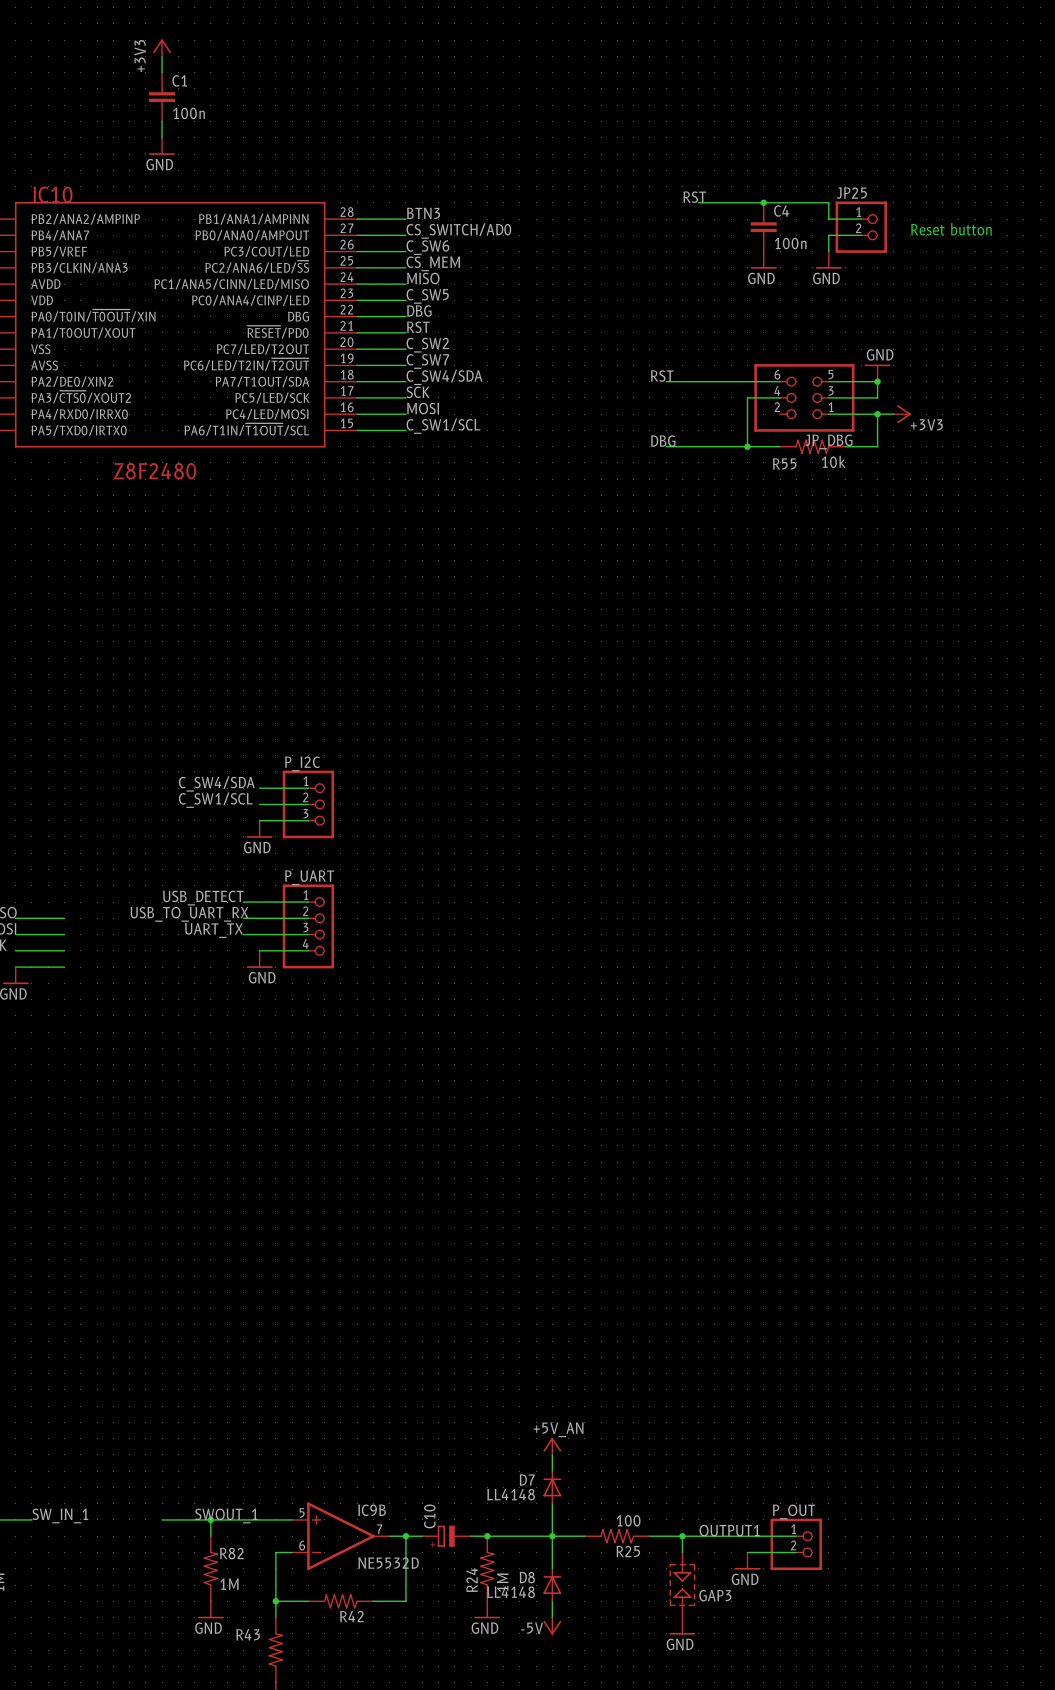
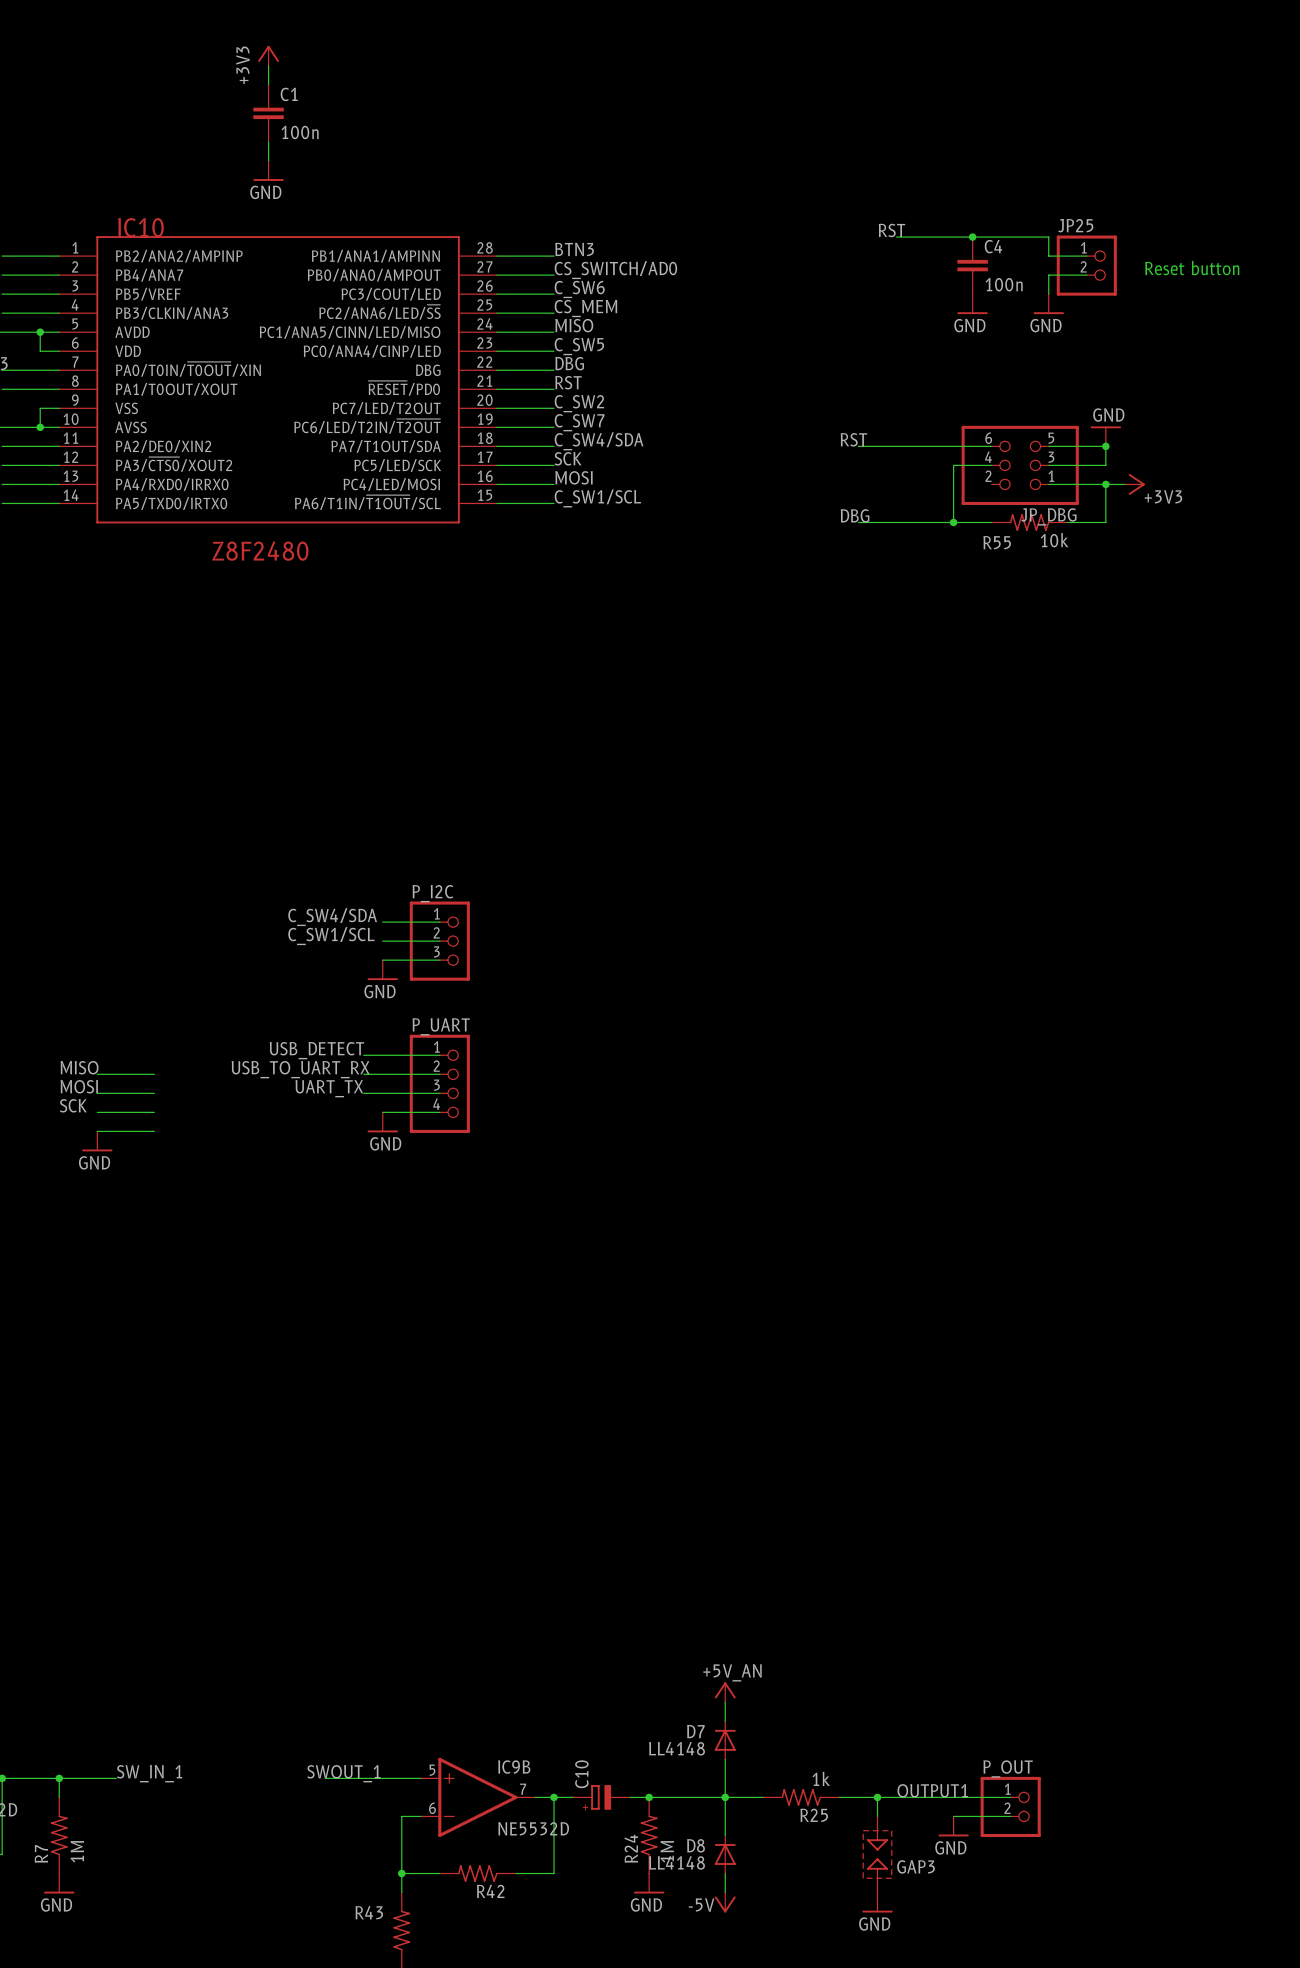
wire: (162, 1519) (210, 1519) (210, 1536) -> none
junction: (210, 1519) -> none
R25 value: 100 (628, 1520) -> 1k (821, 1778)
R82: 1M (210, 1568) -> none
power symbol: GND (210, 1609) -> none

